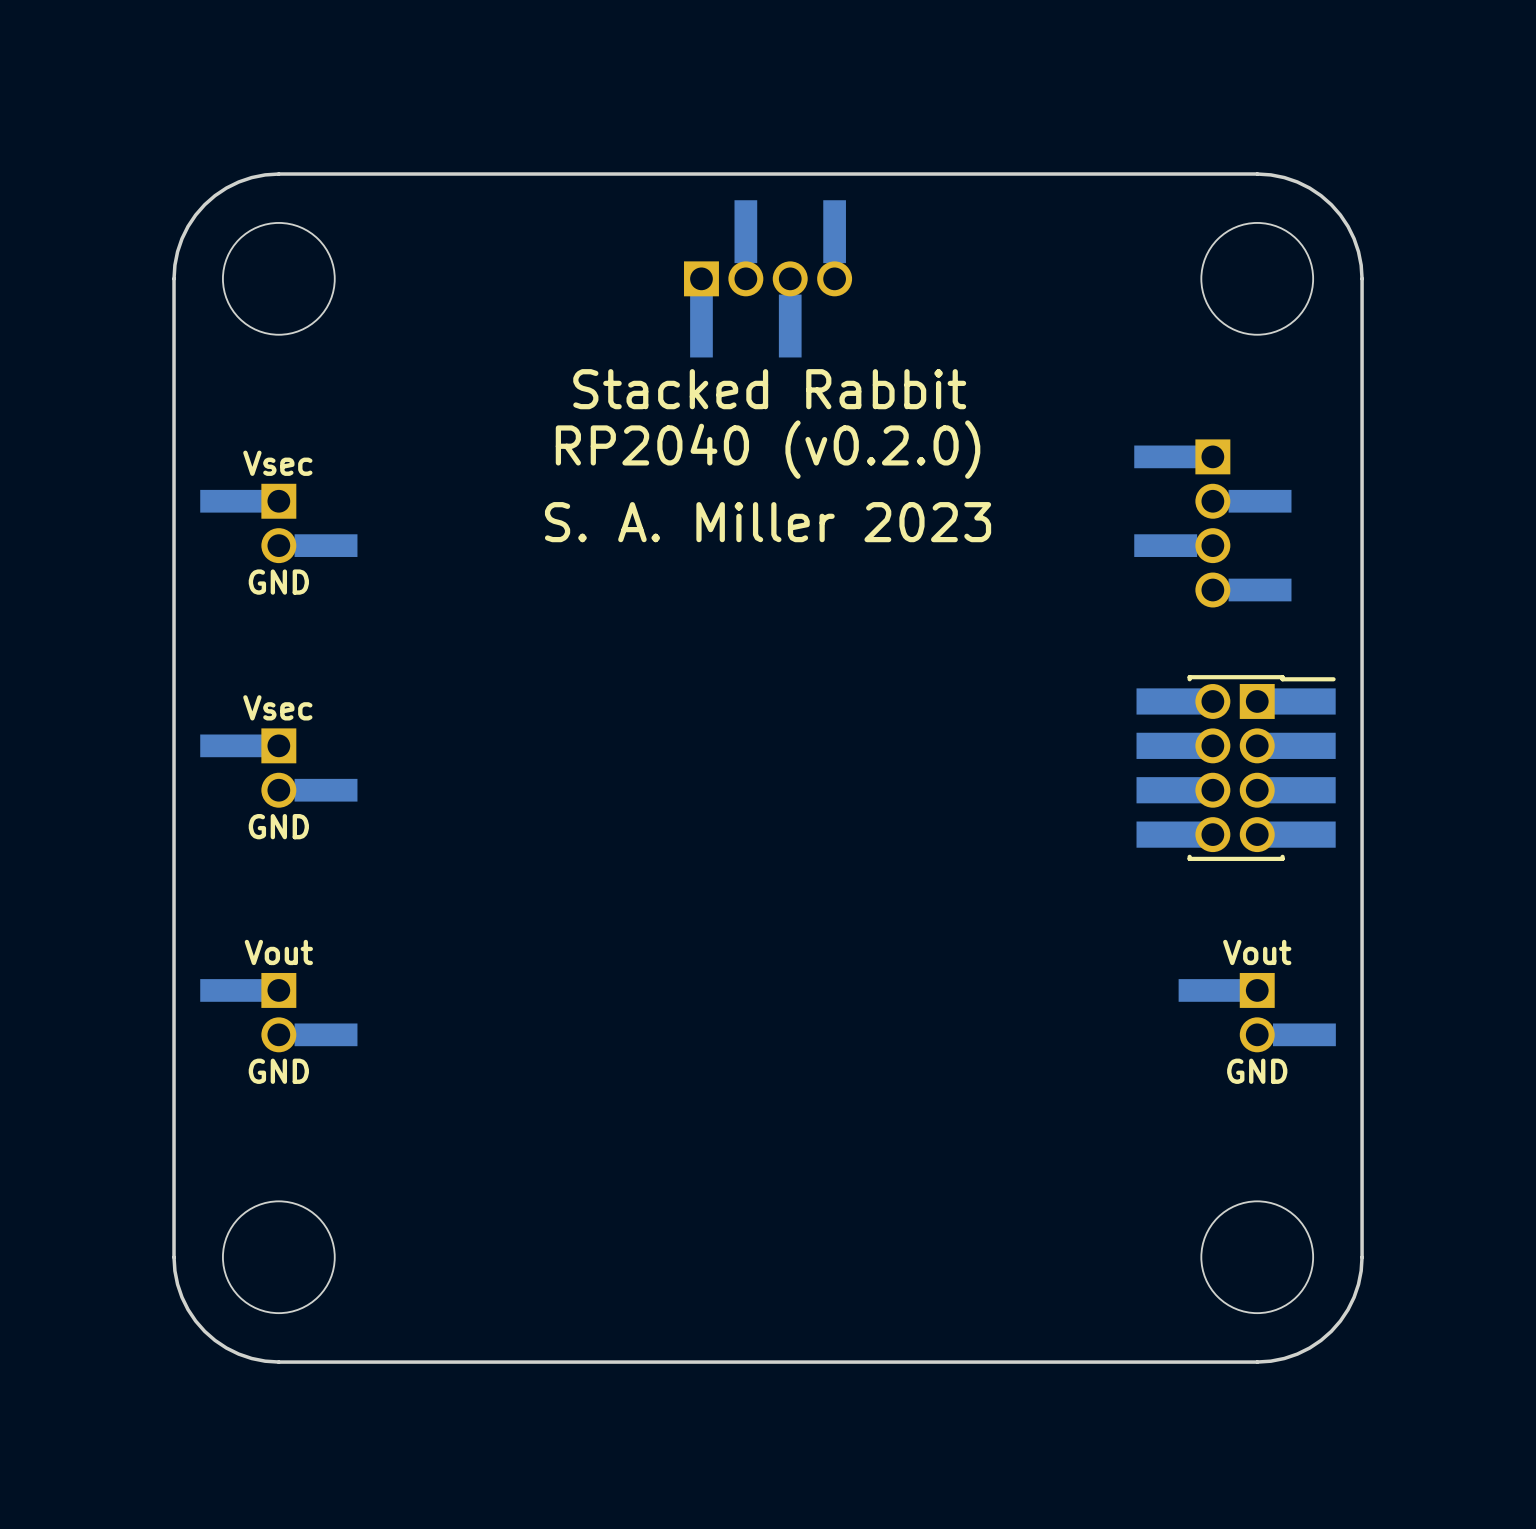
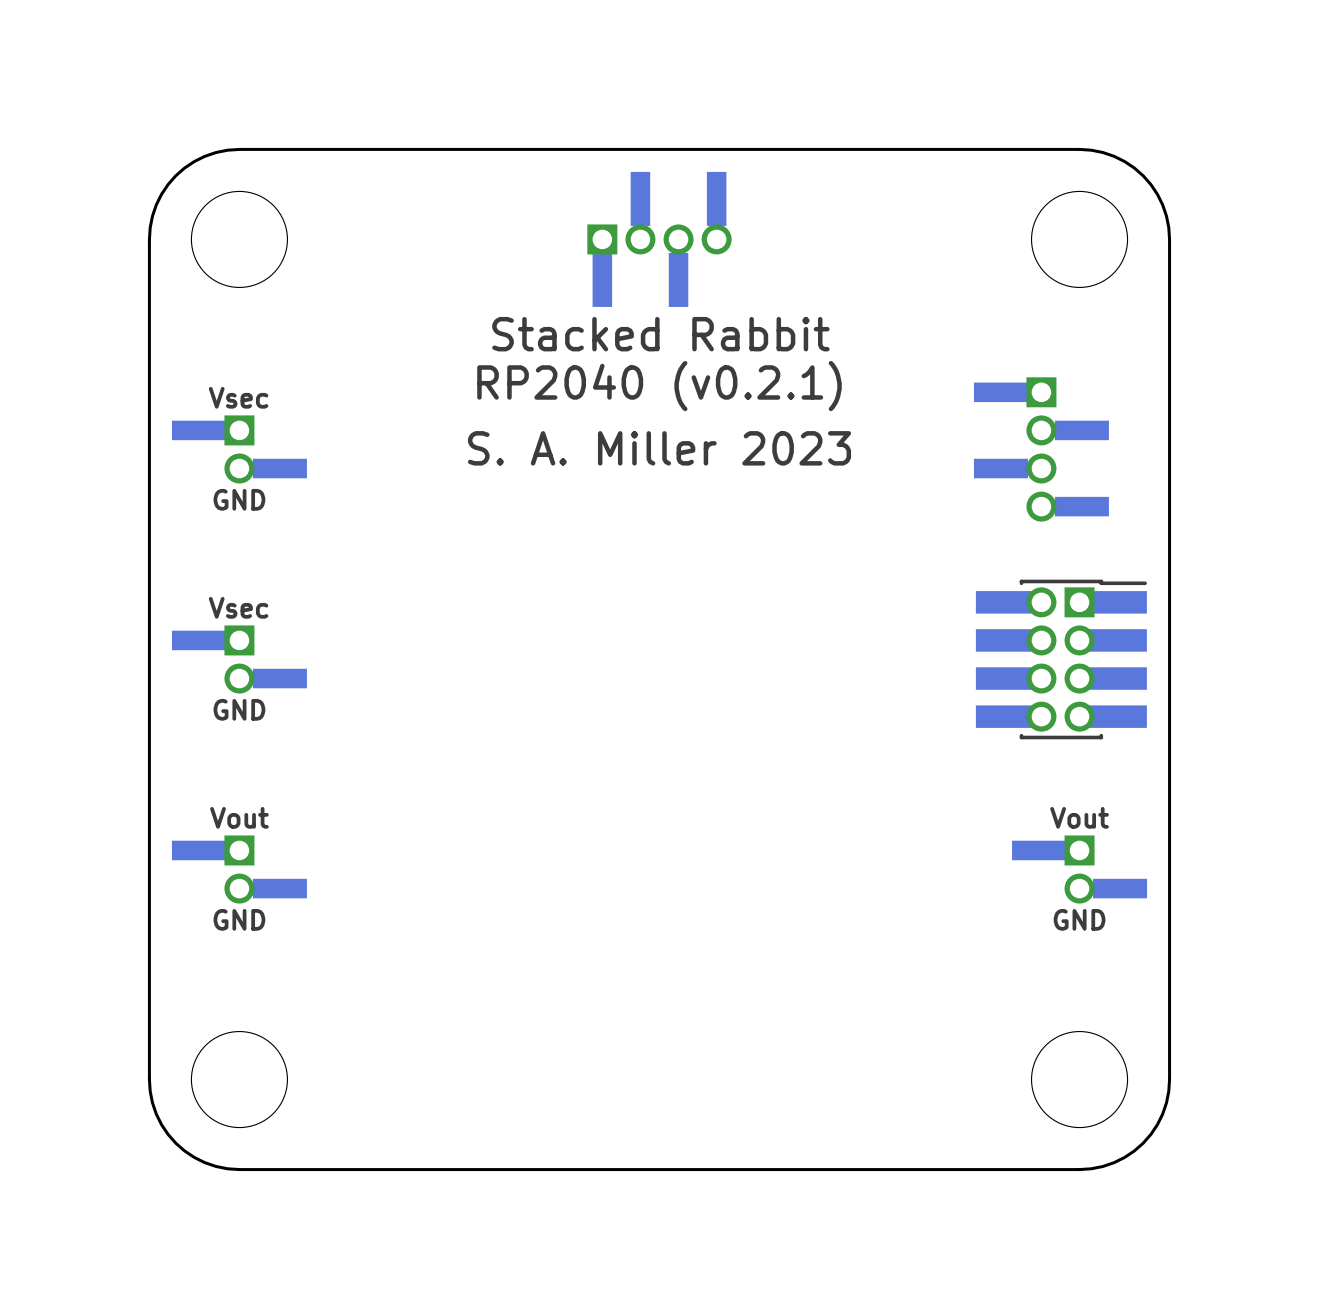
text: RP2040 (v0.2.0) (768, 449) -> RP2040 (v0.2.1) (659, 386)

